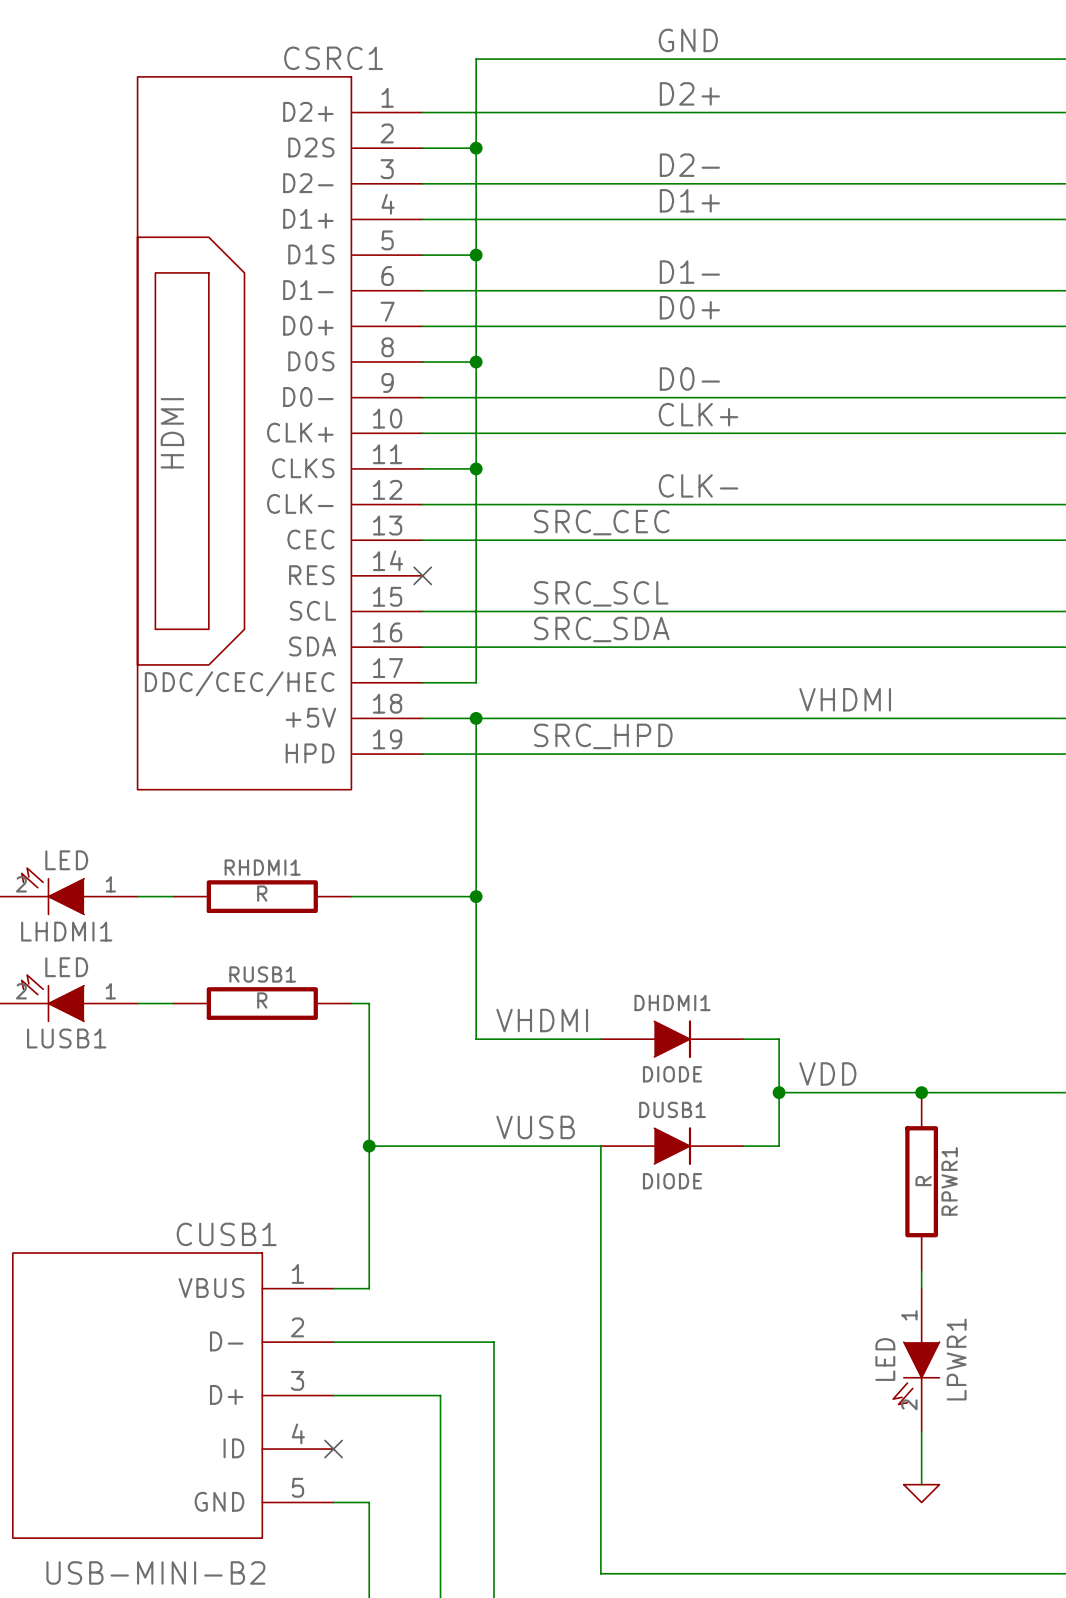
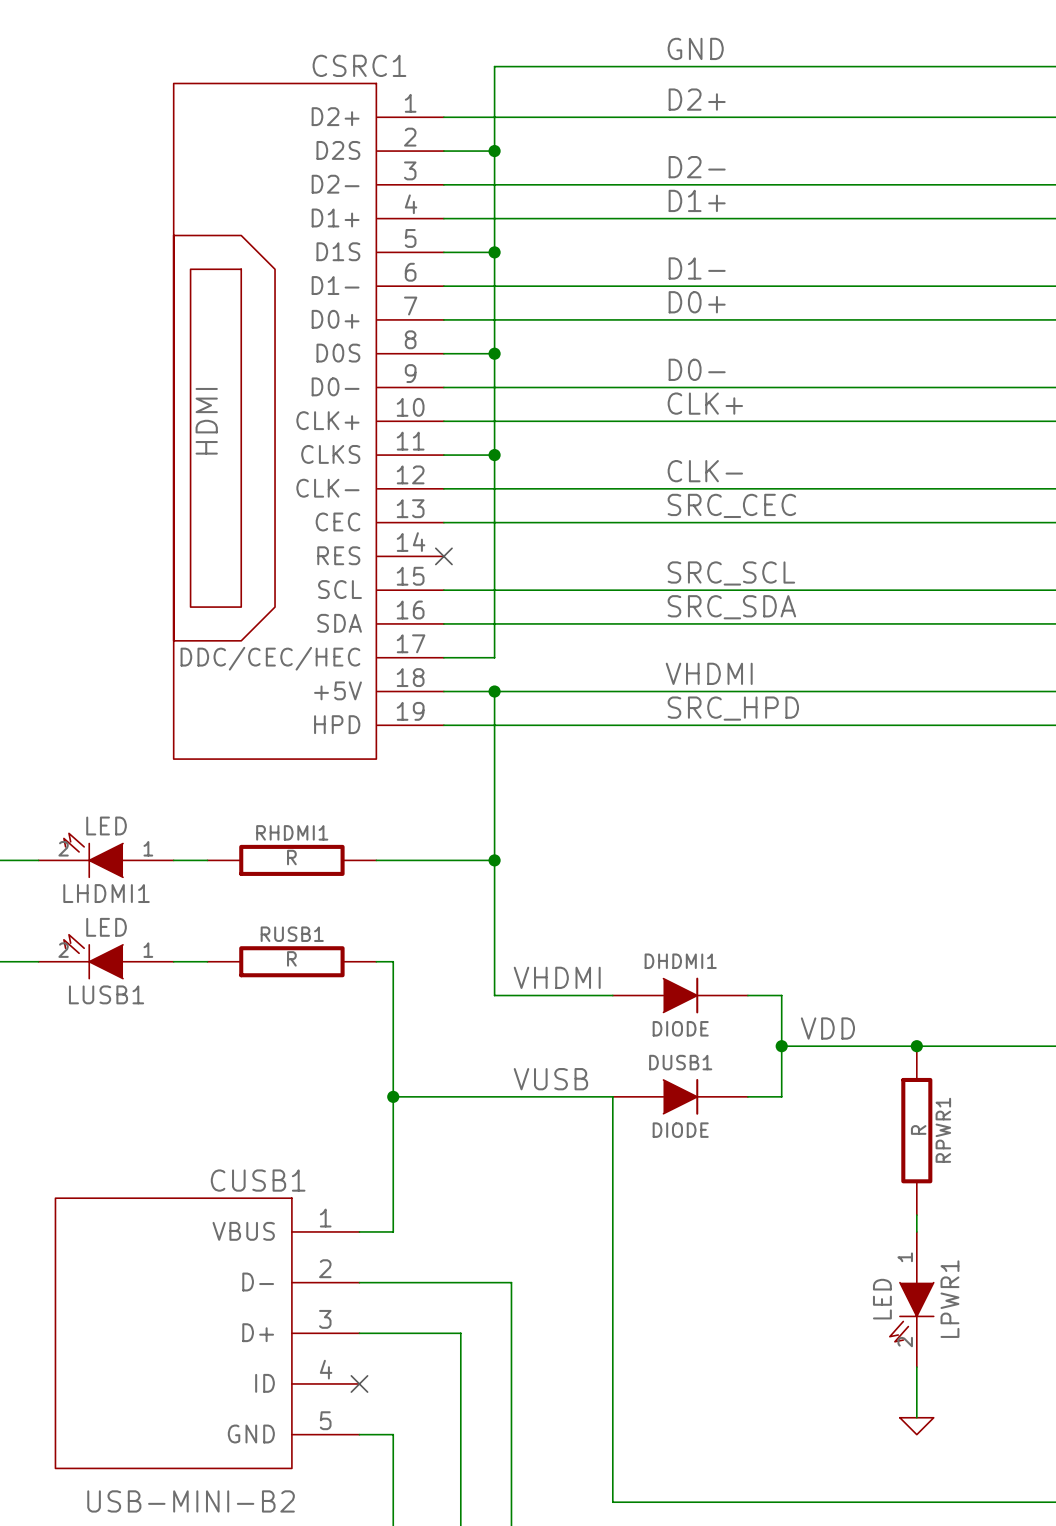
label position: SRC_CEC (601, 522) -> SRC_CEC (731, 505)
label position: SRC_SCL (601, 593) -> SRC_SCL (731, 573)
label position: SRC_SDA (601, 629) -> SRC_SDA (731, 607)
label position: VHDMI (845, 699) -> VHDMI (709, 673)
label position: SRC_HPD (603, 736) -> SRC_HPD (733, 708)

